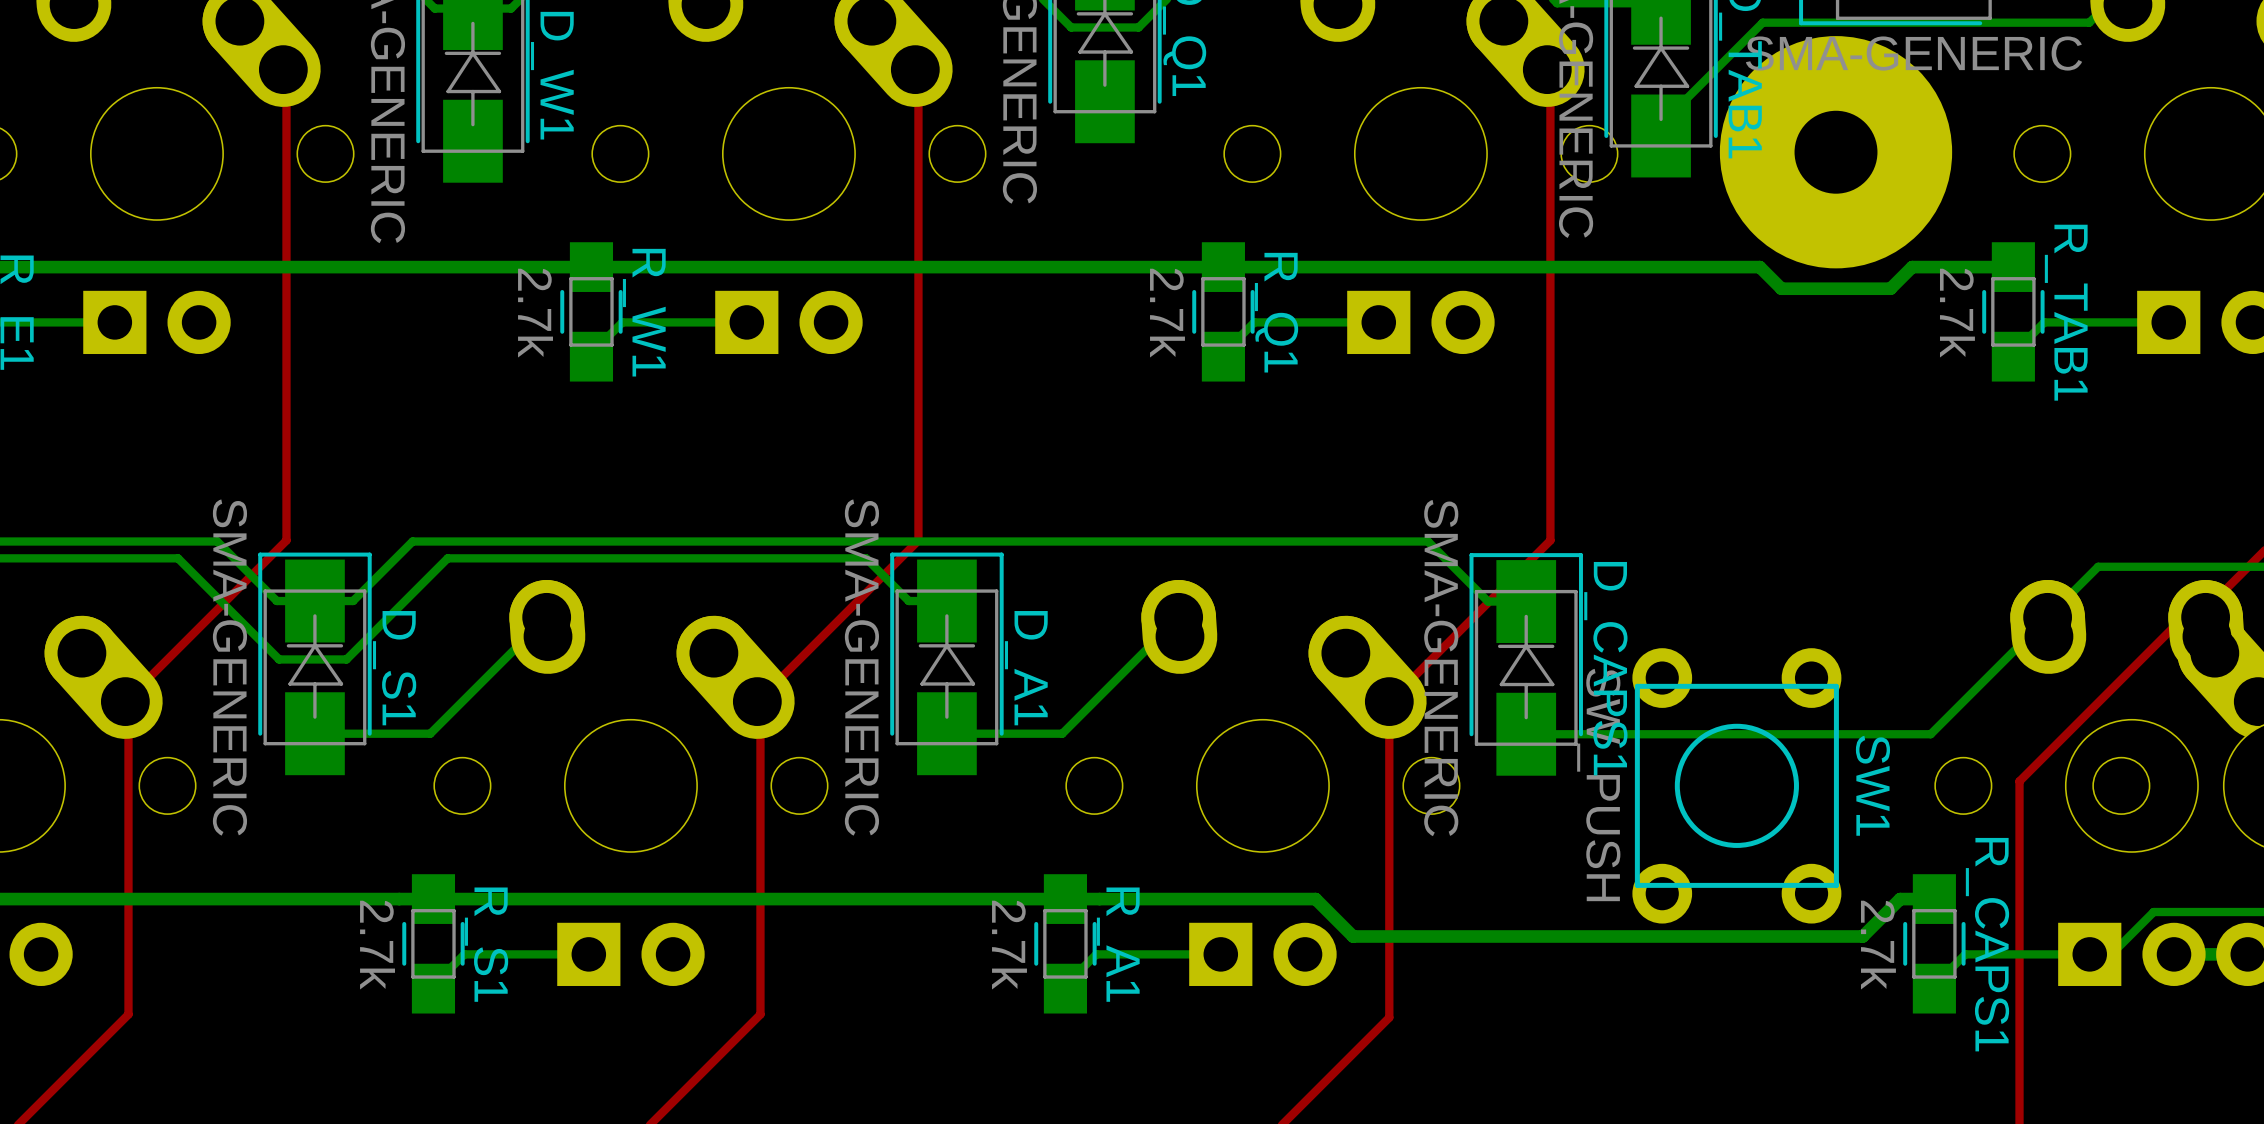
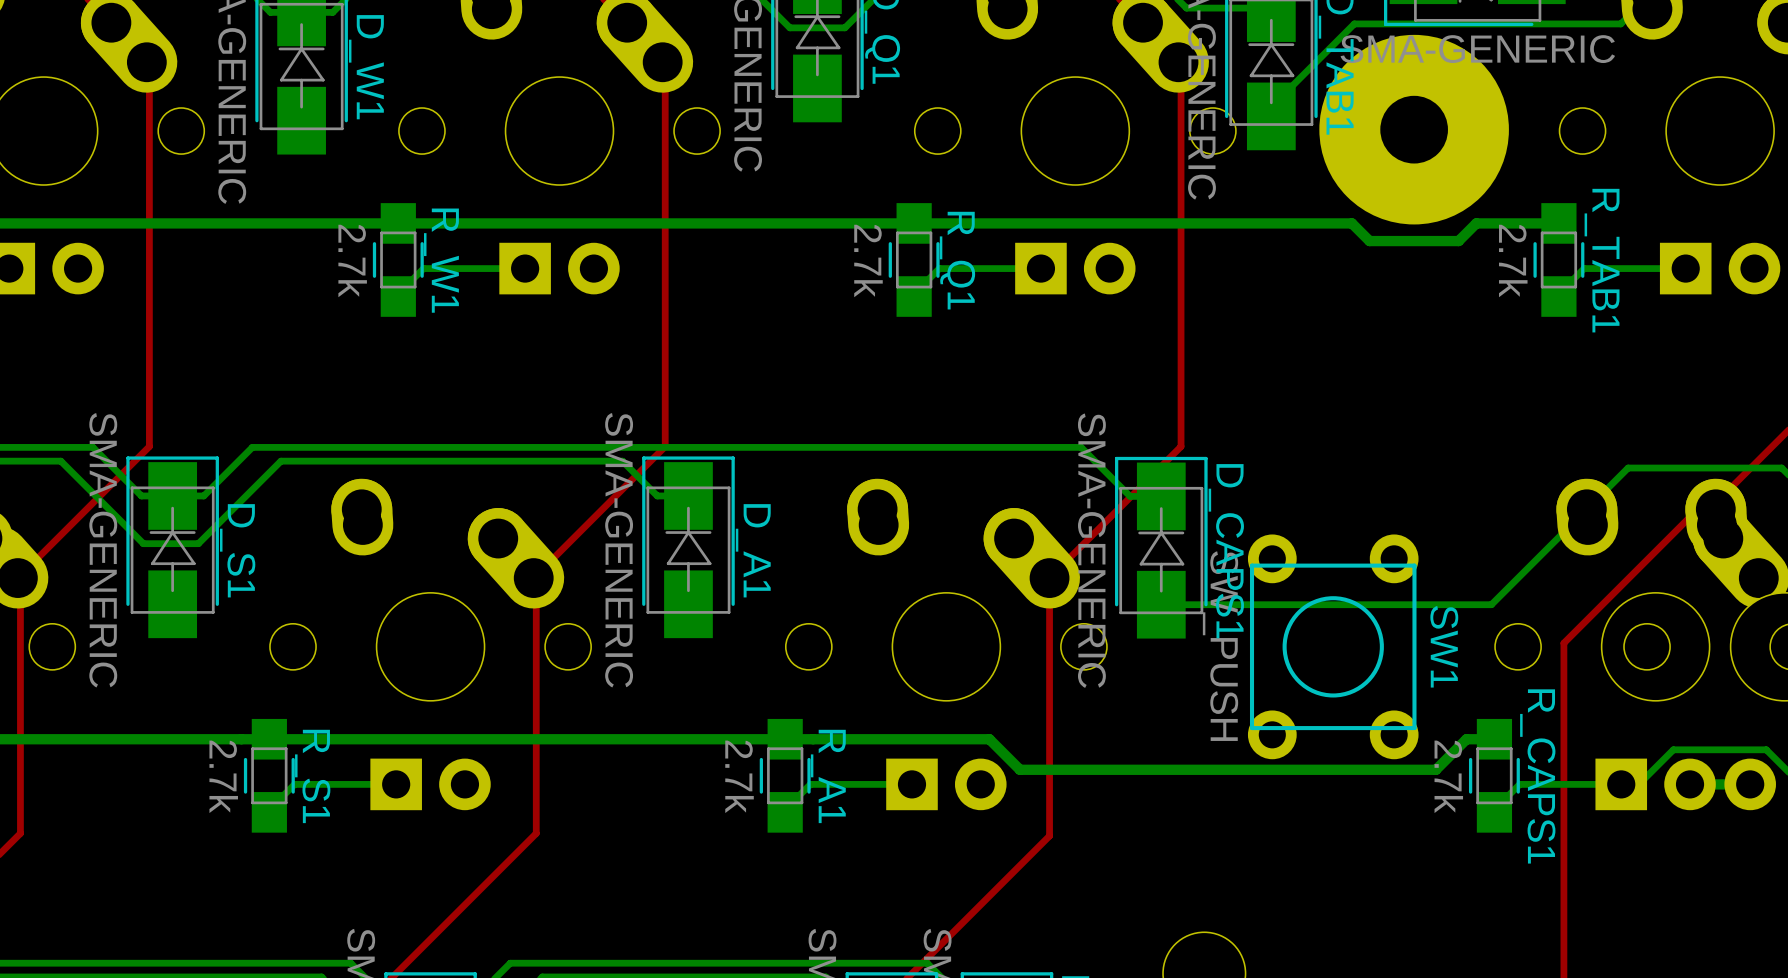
bottom track: (546, 617) (430, 733) (314, 733) -> none
bottom track: (1179, 636) (1159, 636) (1062, 733) (946, 733) -> none

